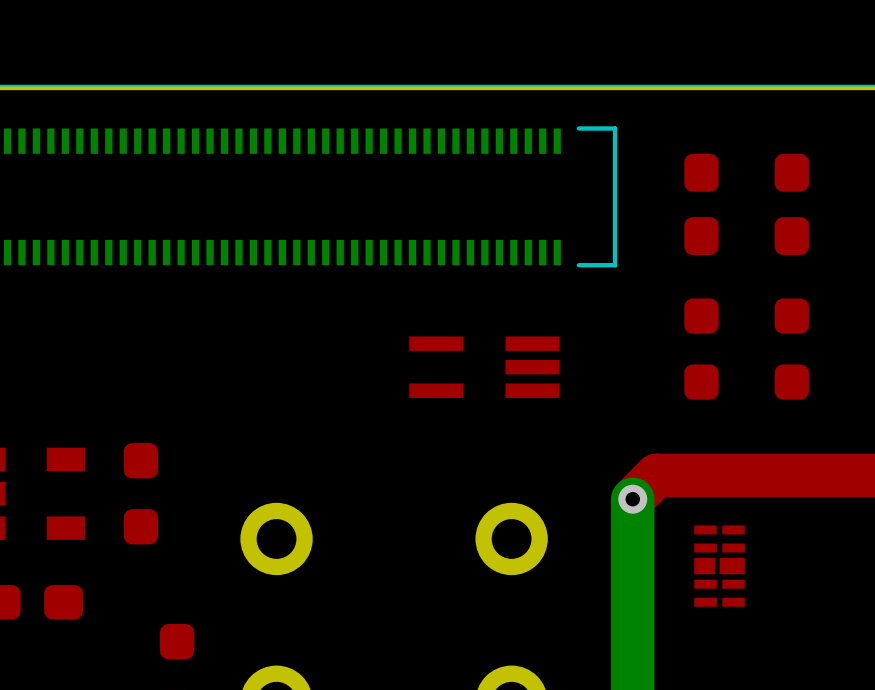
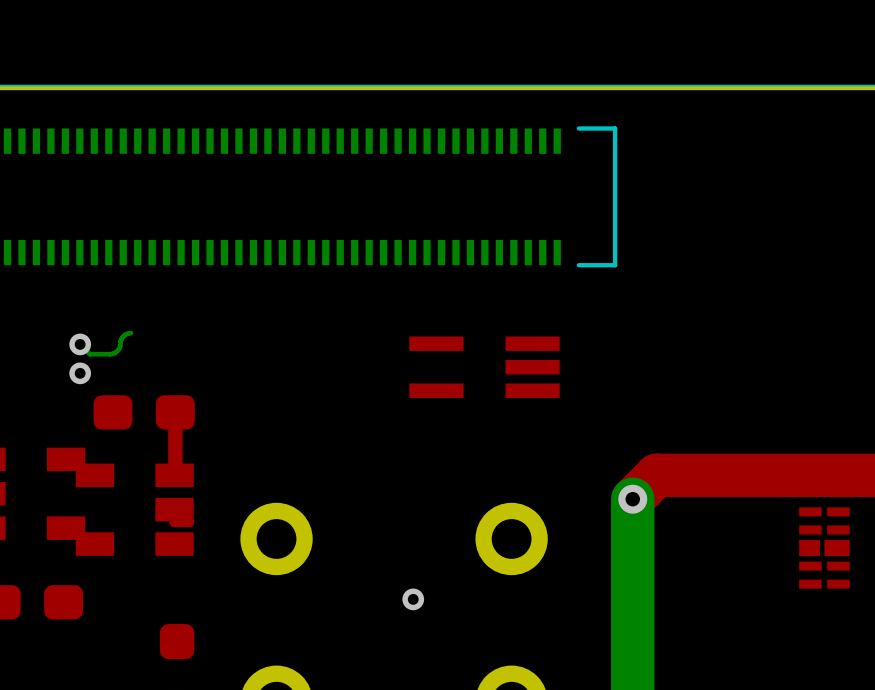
part: (701, 204) -> none
part: (791, 204) -> none
bottom track: none -> (131, 333) (122, 337) (119, 348) (112, 353) (89, 354) (80, 344)
via: none -> (80, 344)
part: (701, 349) -> none
part: (791, 349) -> none
via: none -> (80, 373)
part: none -> (144, 412)
top track: none -> (175, 412) (174, 475)
part footprint: [123, 443, 159, 545] -> [75, 463, 194, 556]
top track: none -> (189, 522) (173, 522)
part position: (719, 566) -> (824, 548)
via: none -> (413, 599)

